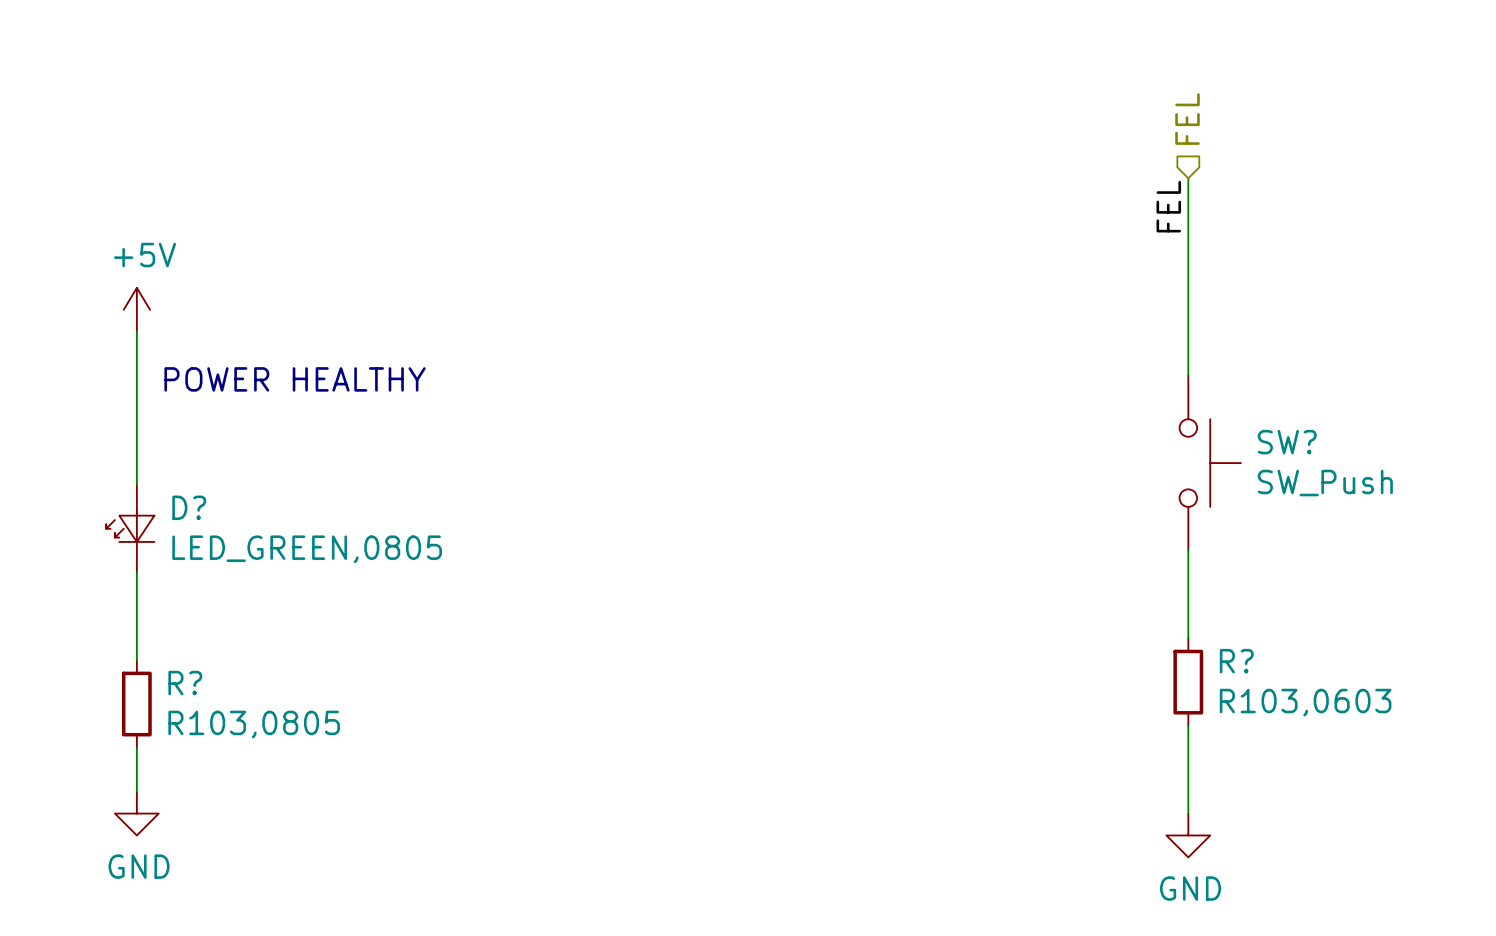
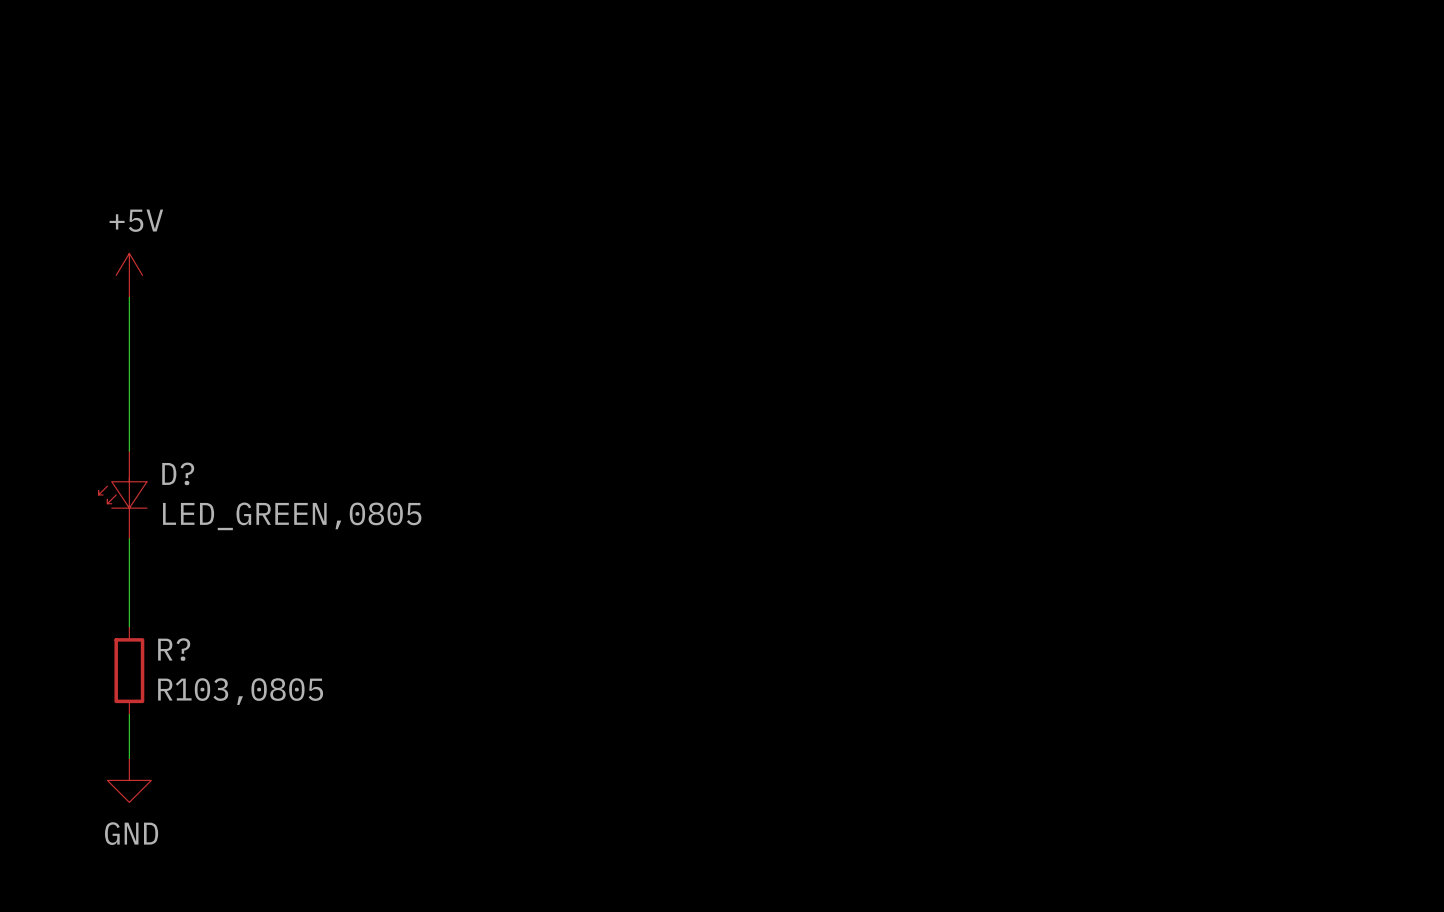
hierarchical label: FEL (1187, 119) -> none
wire: (1188, 178) (1188, 375) -> none
label: FEL (1168, 206) -> none
text: POWER HEALTHY (295, 379) -> none
SW?: SW_Push (1210, 463) -> none
wire: (1188, 550) (1188, 638) -> none
R?: R103,0603 (1188, 682) -> none
wire: (1188, 725) (1188, 813) -> none
power symbol: GND (1188, 835) -> none

